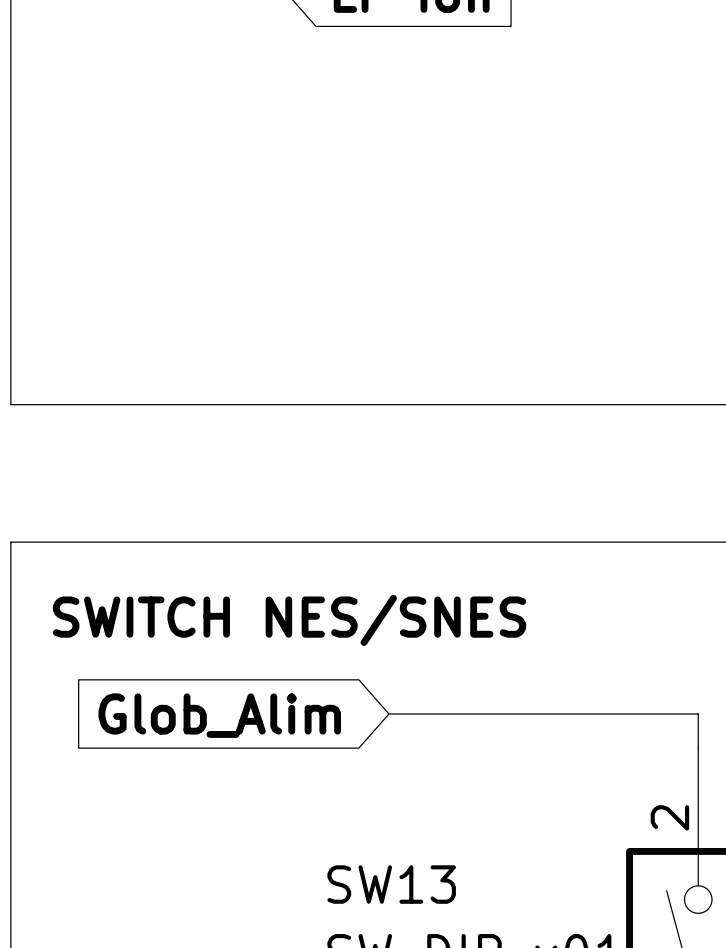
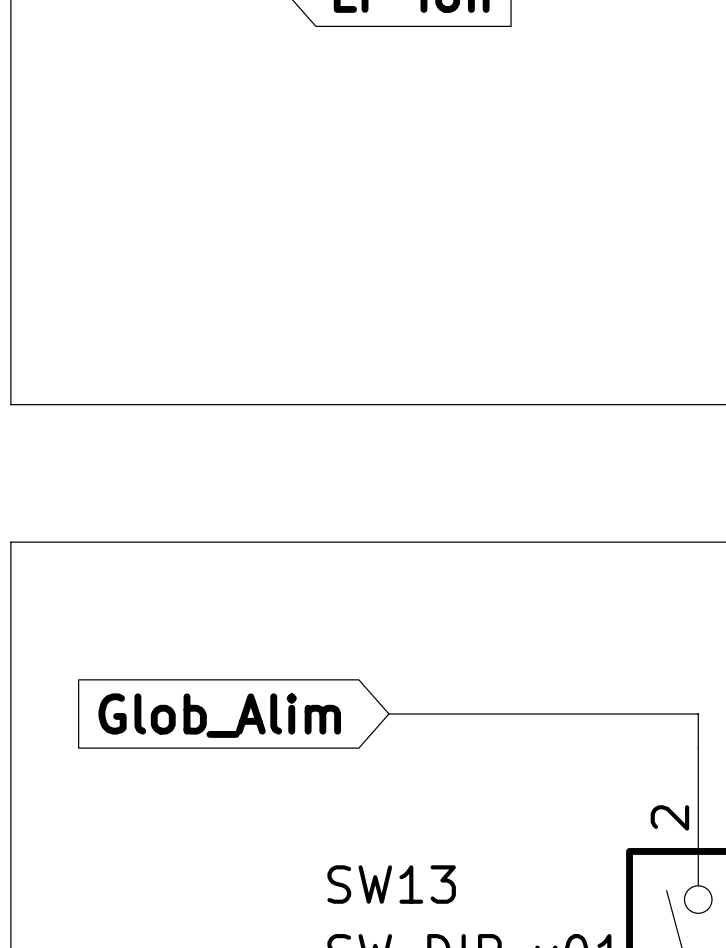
text: SWITCH NES/SNES (289, 620) -> none

